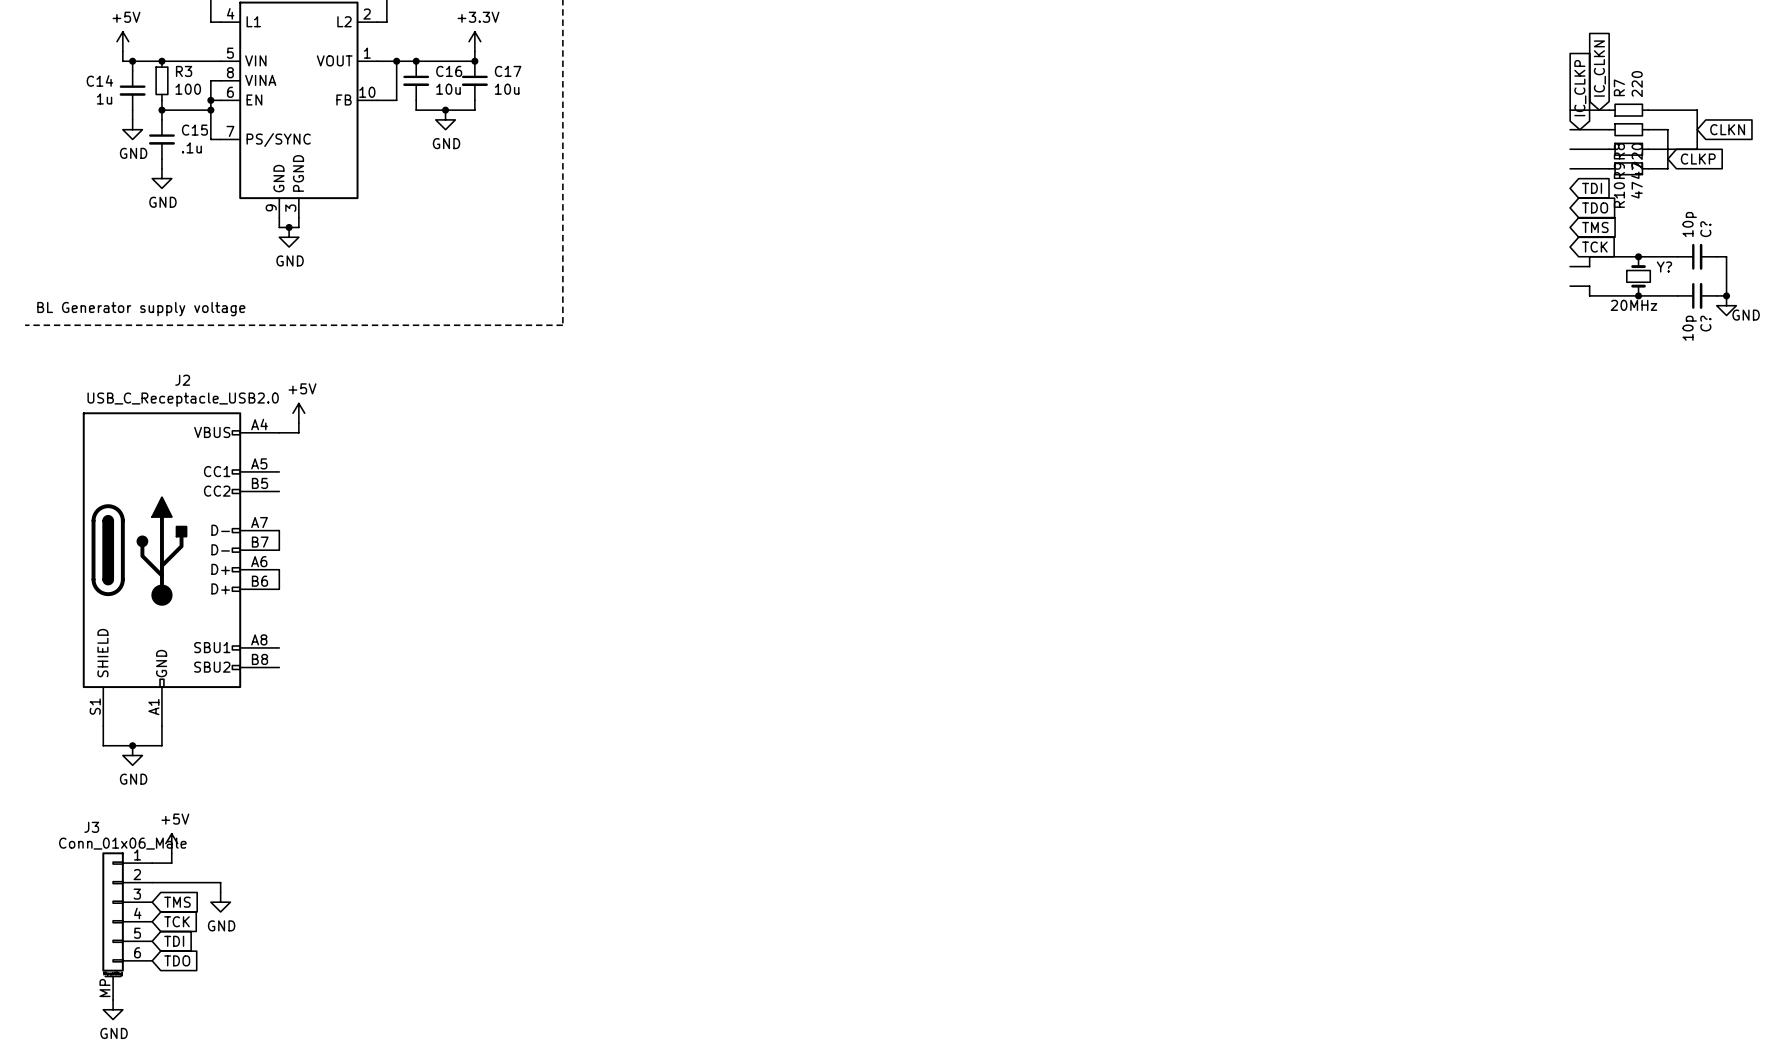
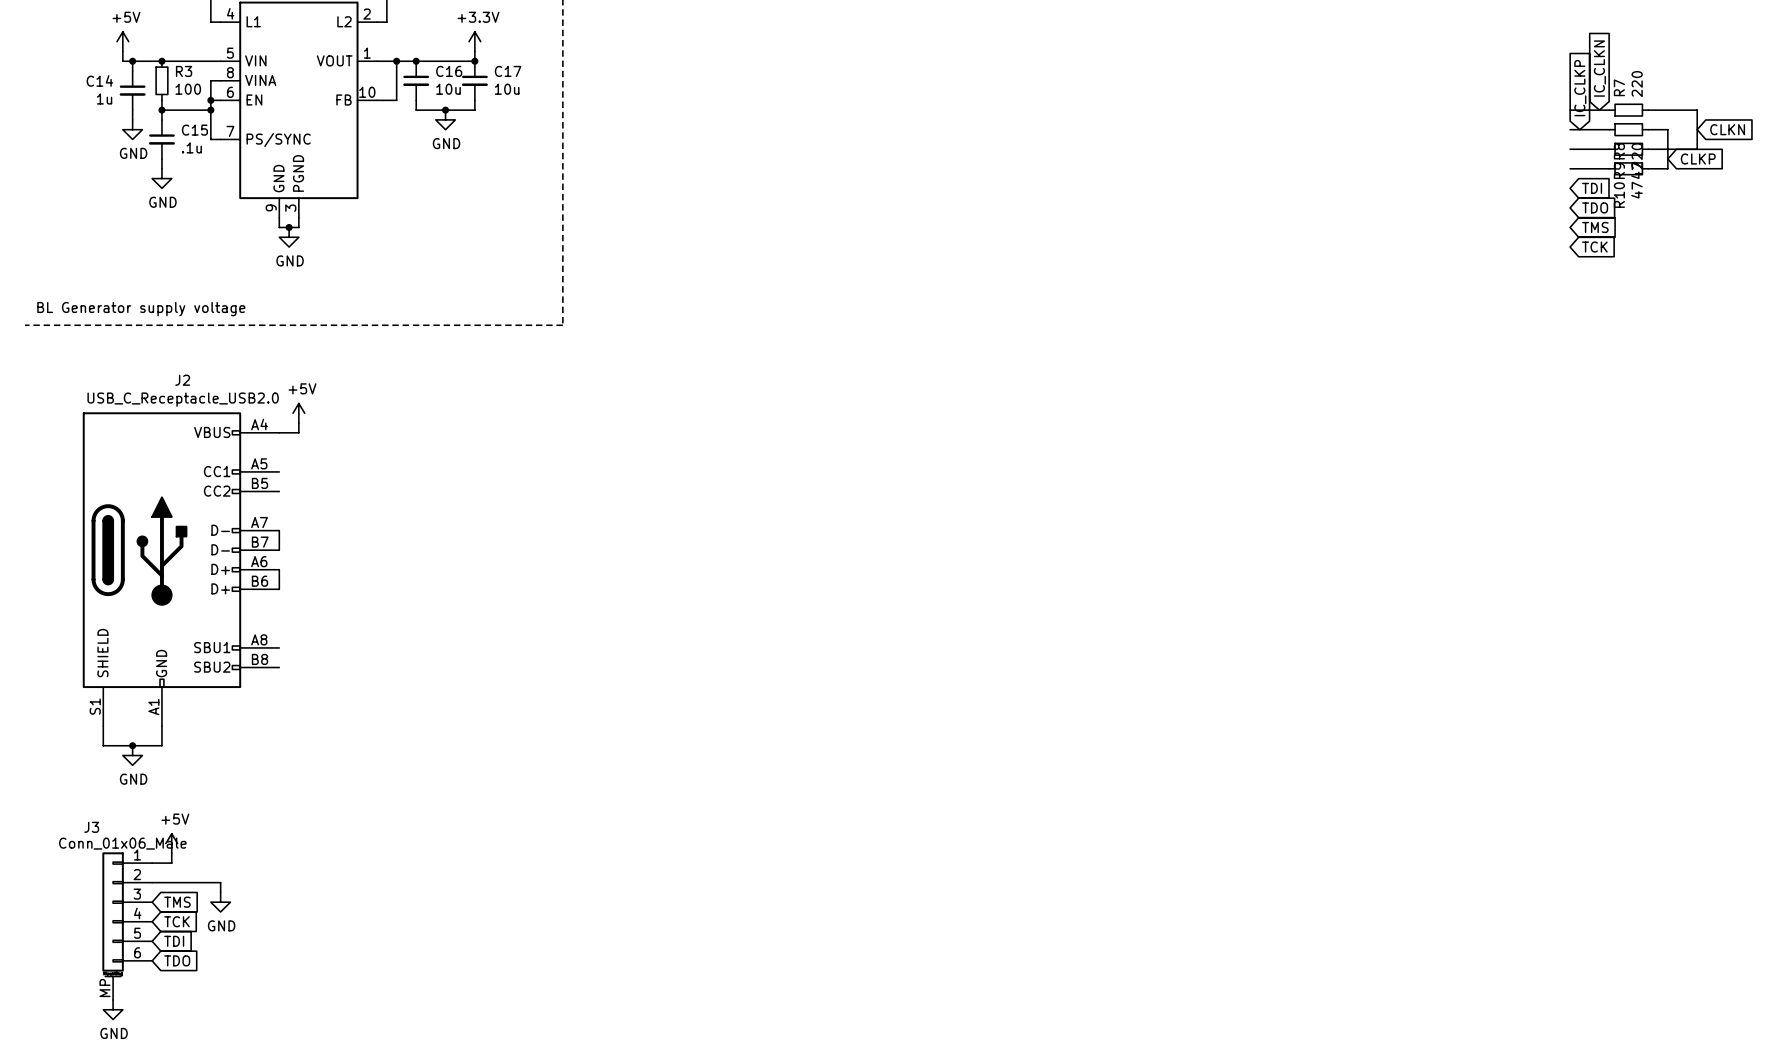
junction: (1638, 256) -> none
wire: (1677, 256) (1589, 256) (1589, 266) (1570, 266) -> none
C?: 10p (1697, 256) -> none
wire: (1716, 256) (1726, 256) (1726, 295) (1716, 295) -> none
Y?: 20MHz (1638, 276) -> none
wire: (1570, 286) (1589, 286) (1589, 295) (1677, 295) -> none
junction: (1638, 295) -> none
C?: 10p (1697, 295) -> none
junction: (1726, 295) -> none
power symbol: GND (1726, 305) -> none

